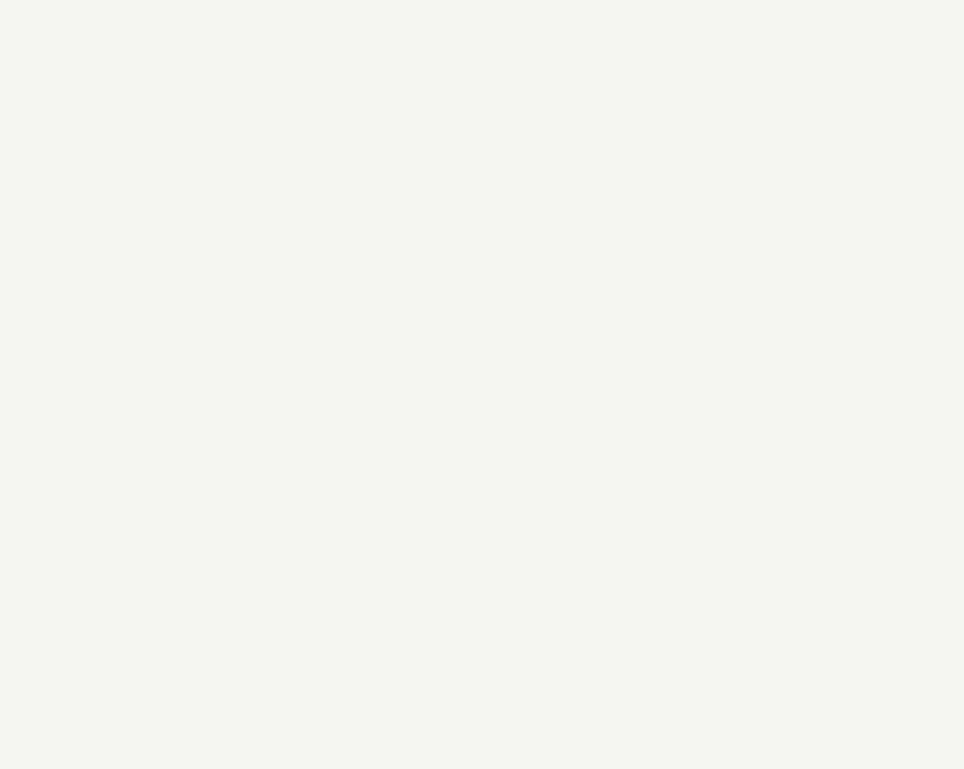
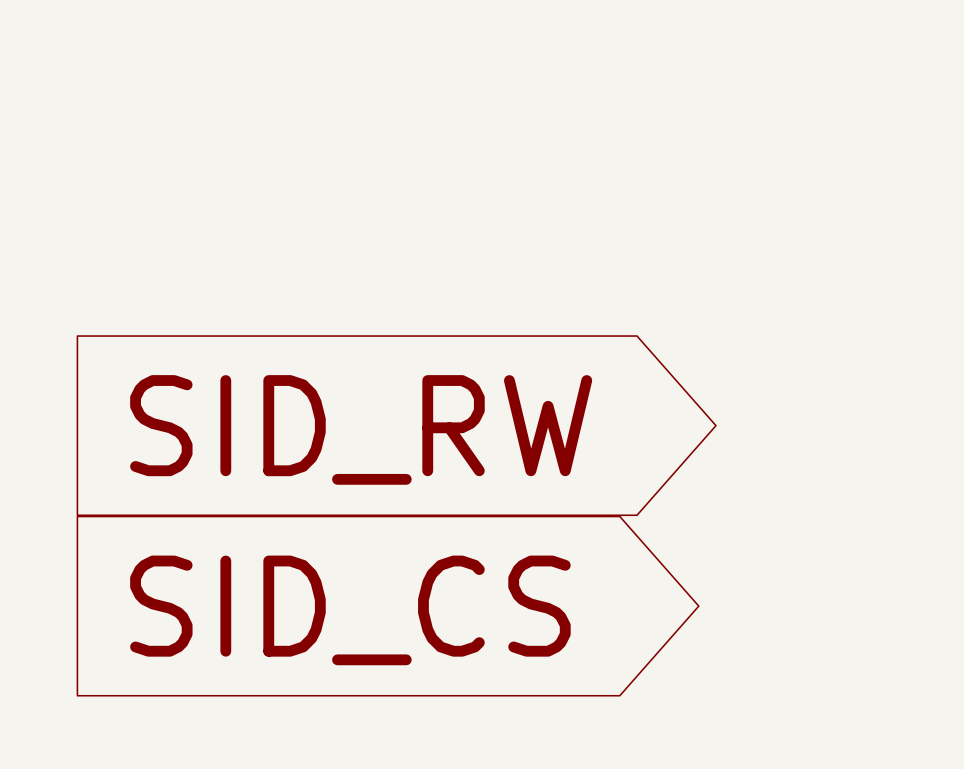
global label: none -> SID_RW (361, 429)
global label: none -> SID_CS (350, 610)

